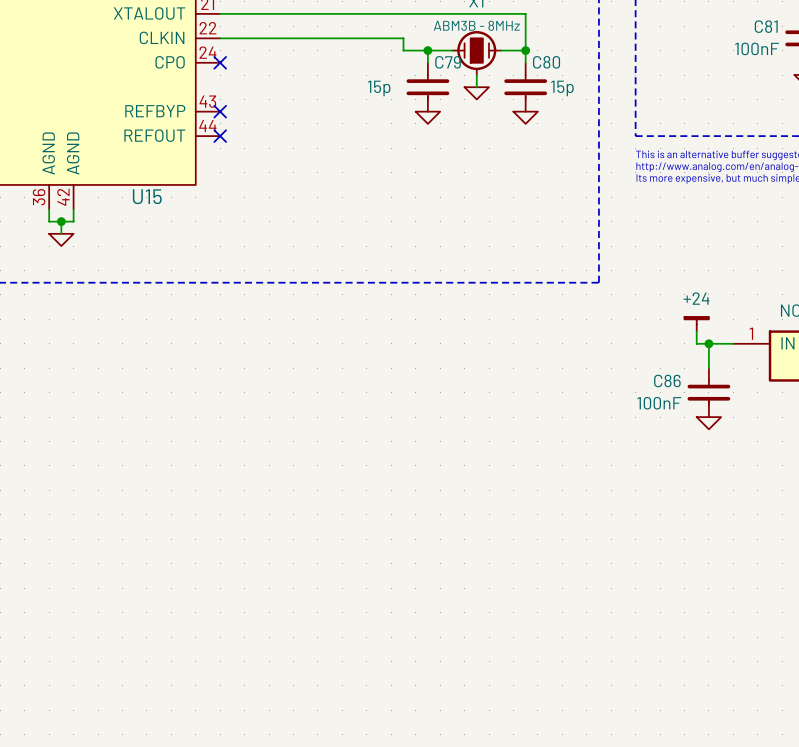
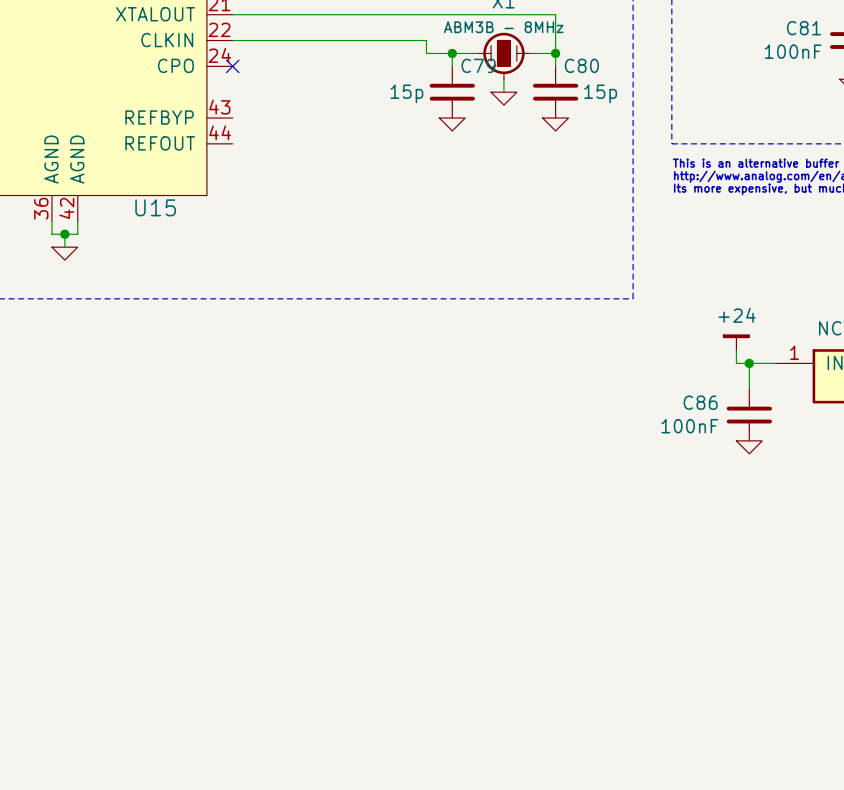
no-connect mark: (220, 111) -> none
no-connect mark: (220, 136) -> none

